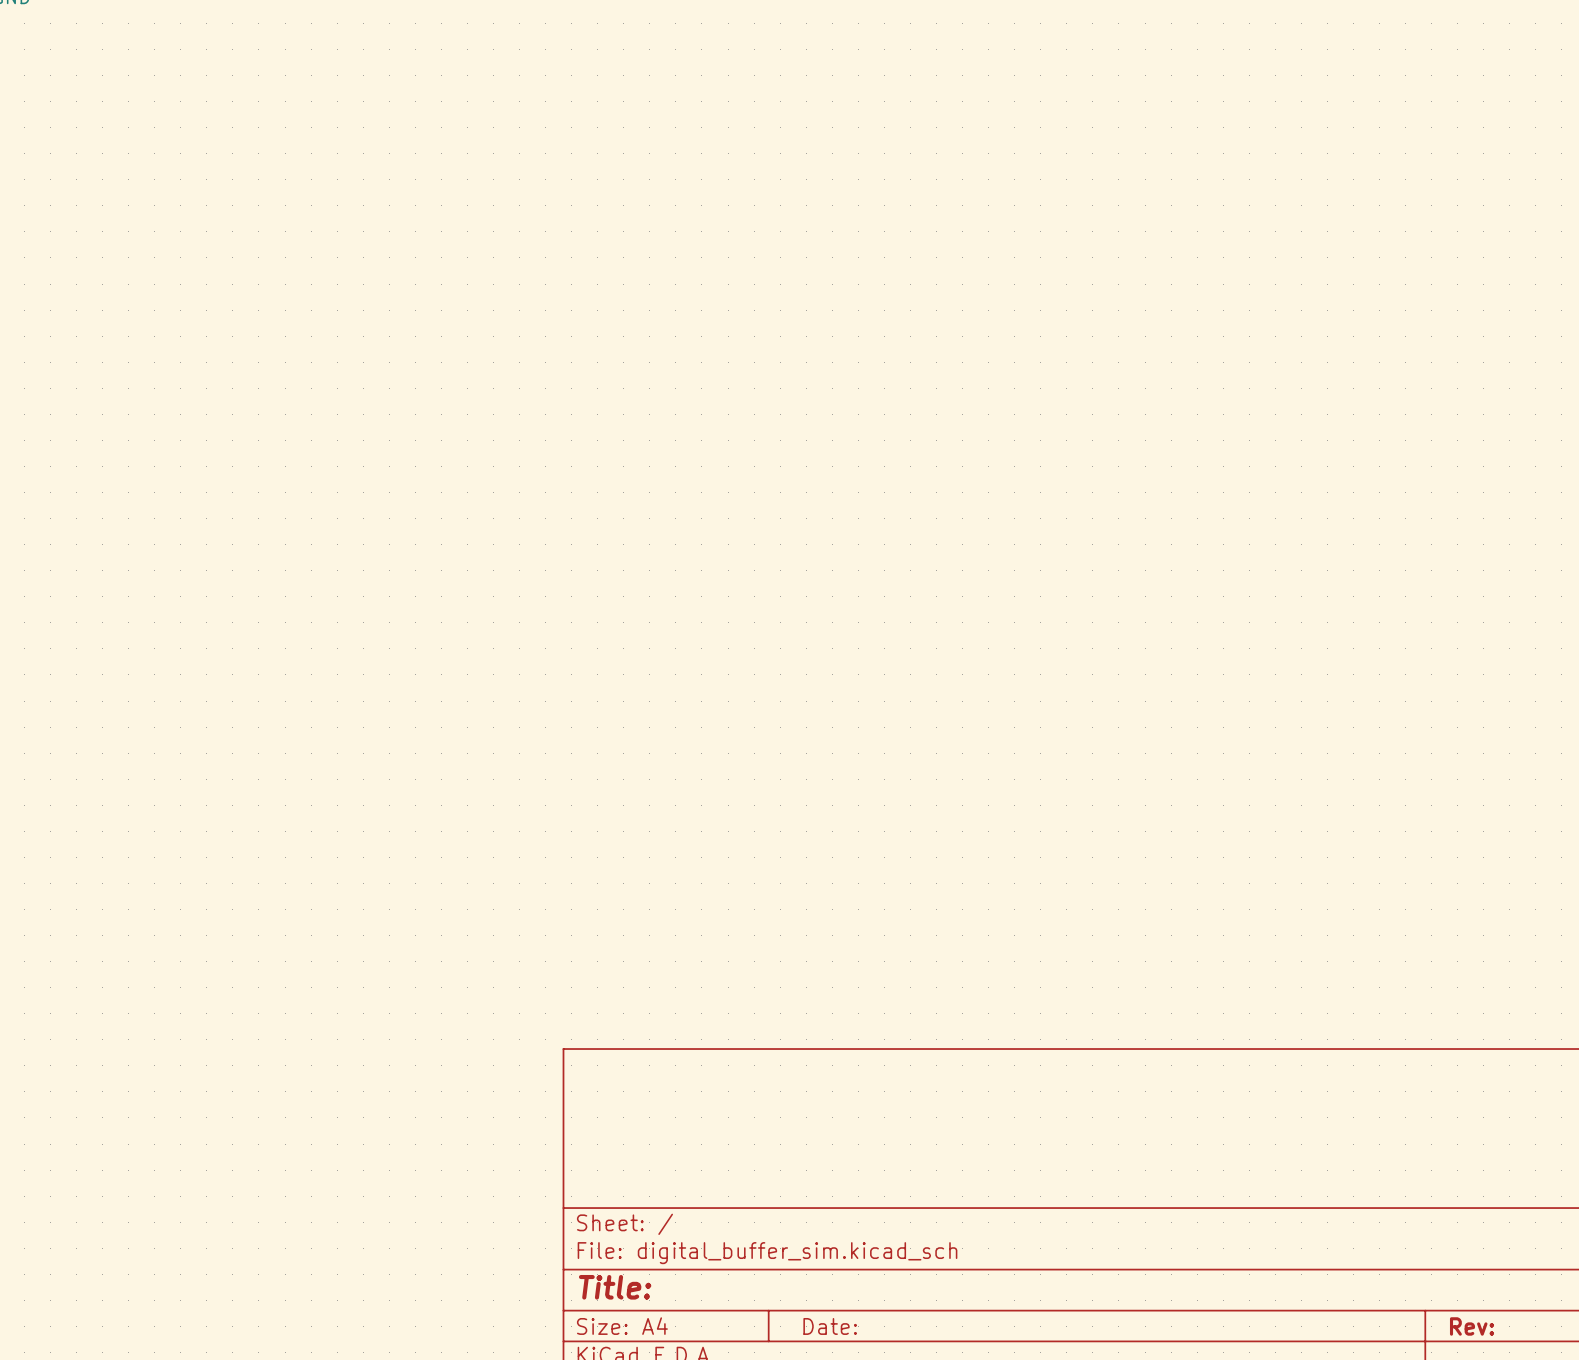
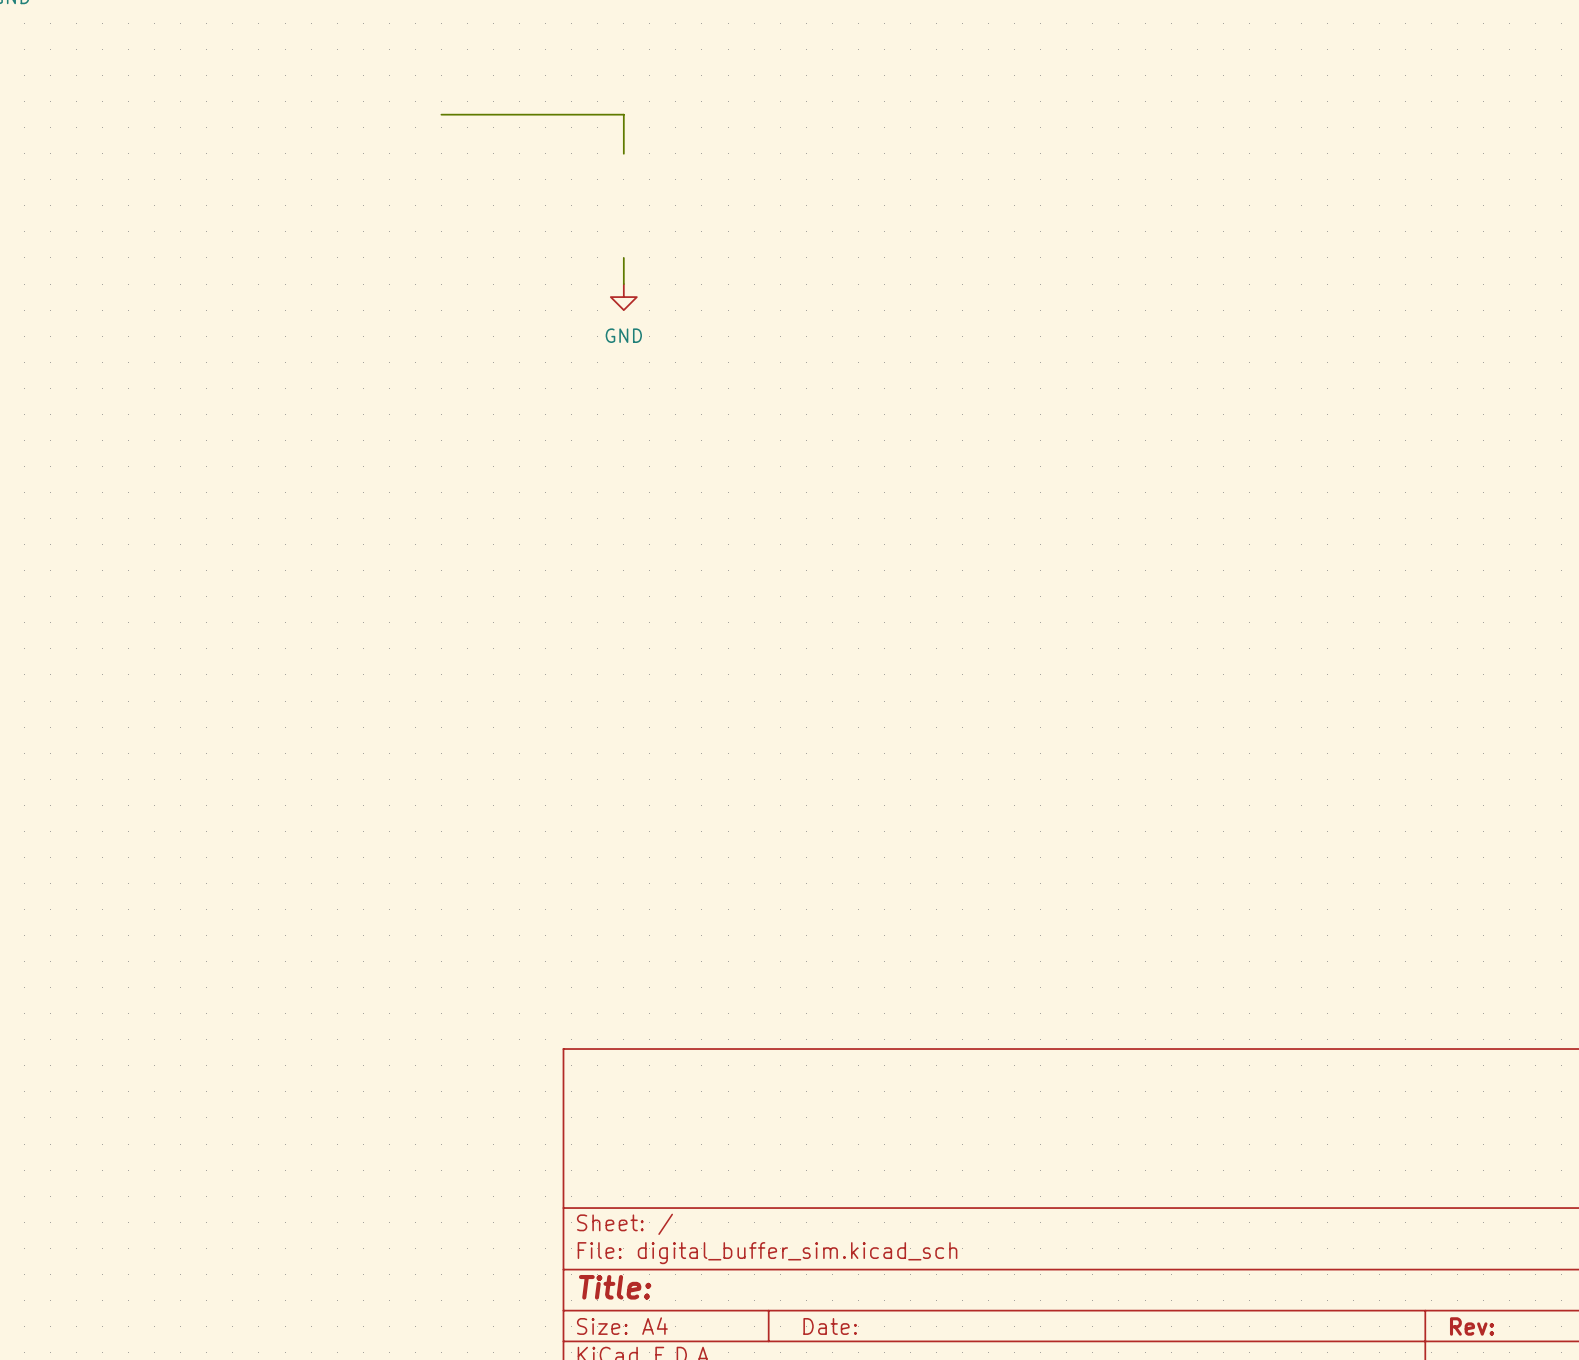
wire: none -> (441, 114) (623, 114) (623, 153)
wire: none -> (623, 257) (623, 284)
power symbol: none -> GND (623, 297)

